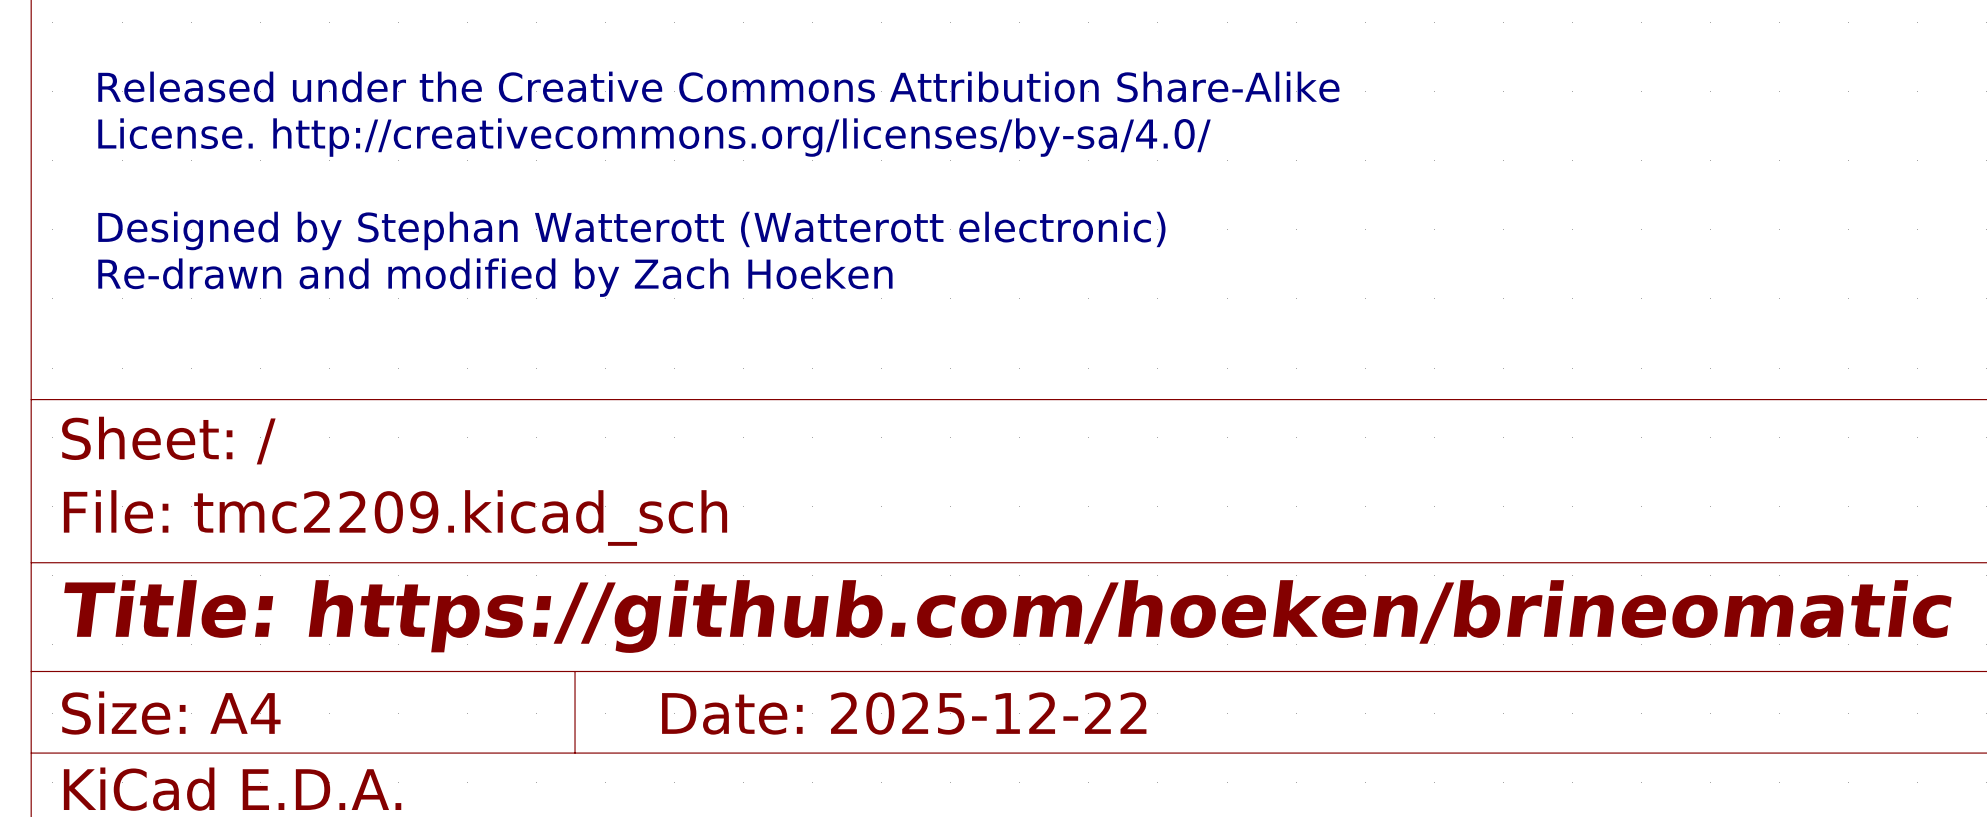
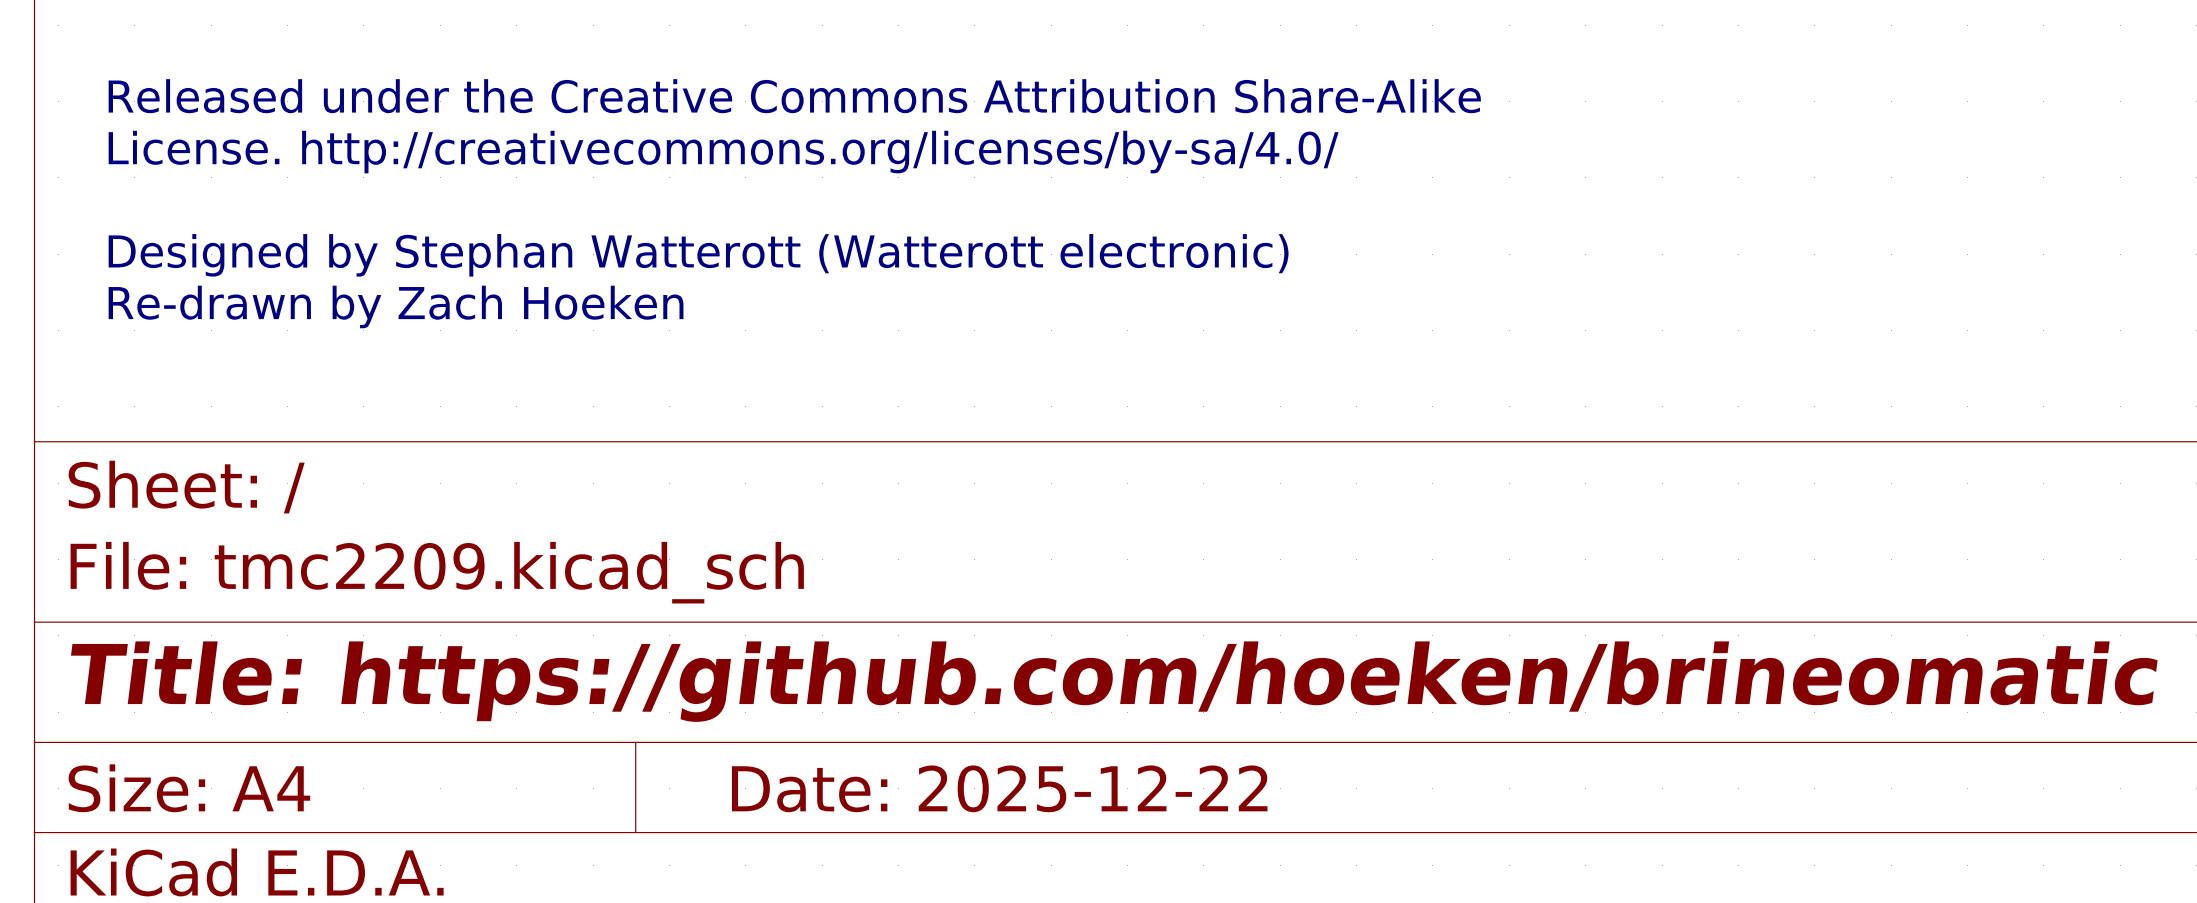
text: Re-drawn and modified by Zach Hoeken (495, 277) -> Re-drawn by Zach Hoeken (396, 306)

